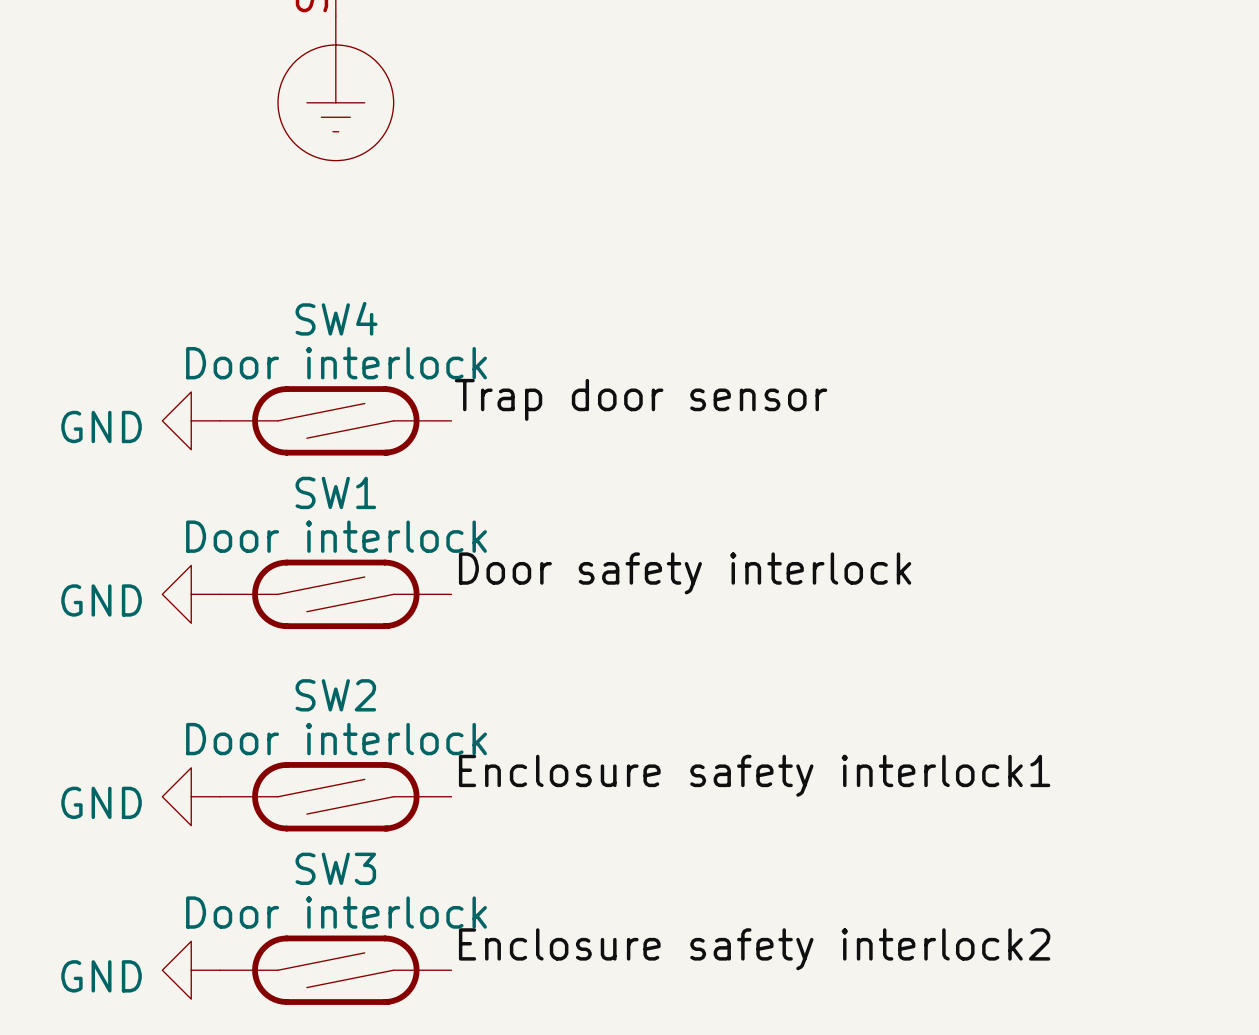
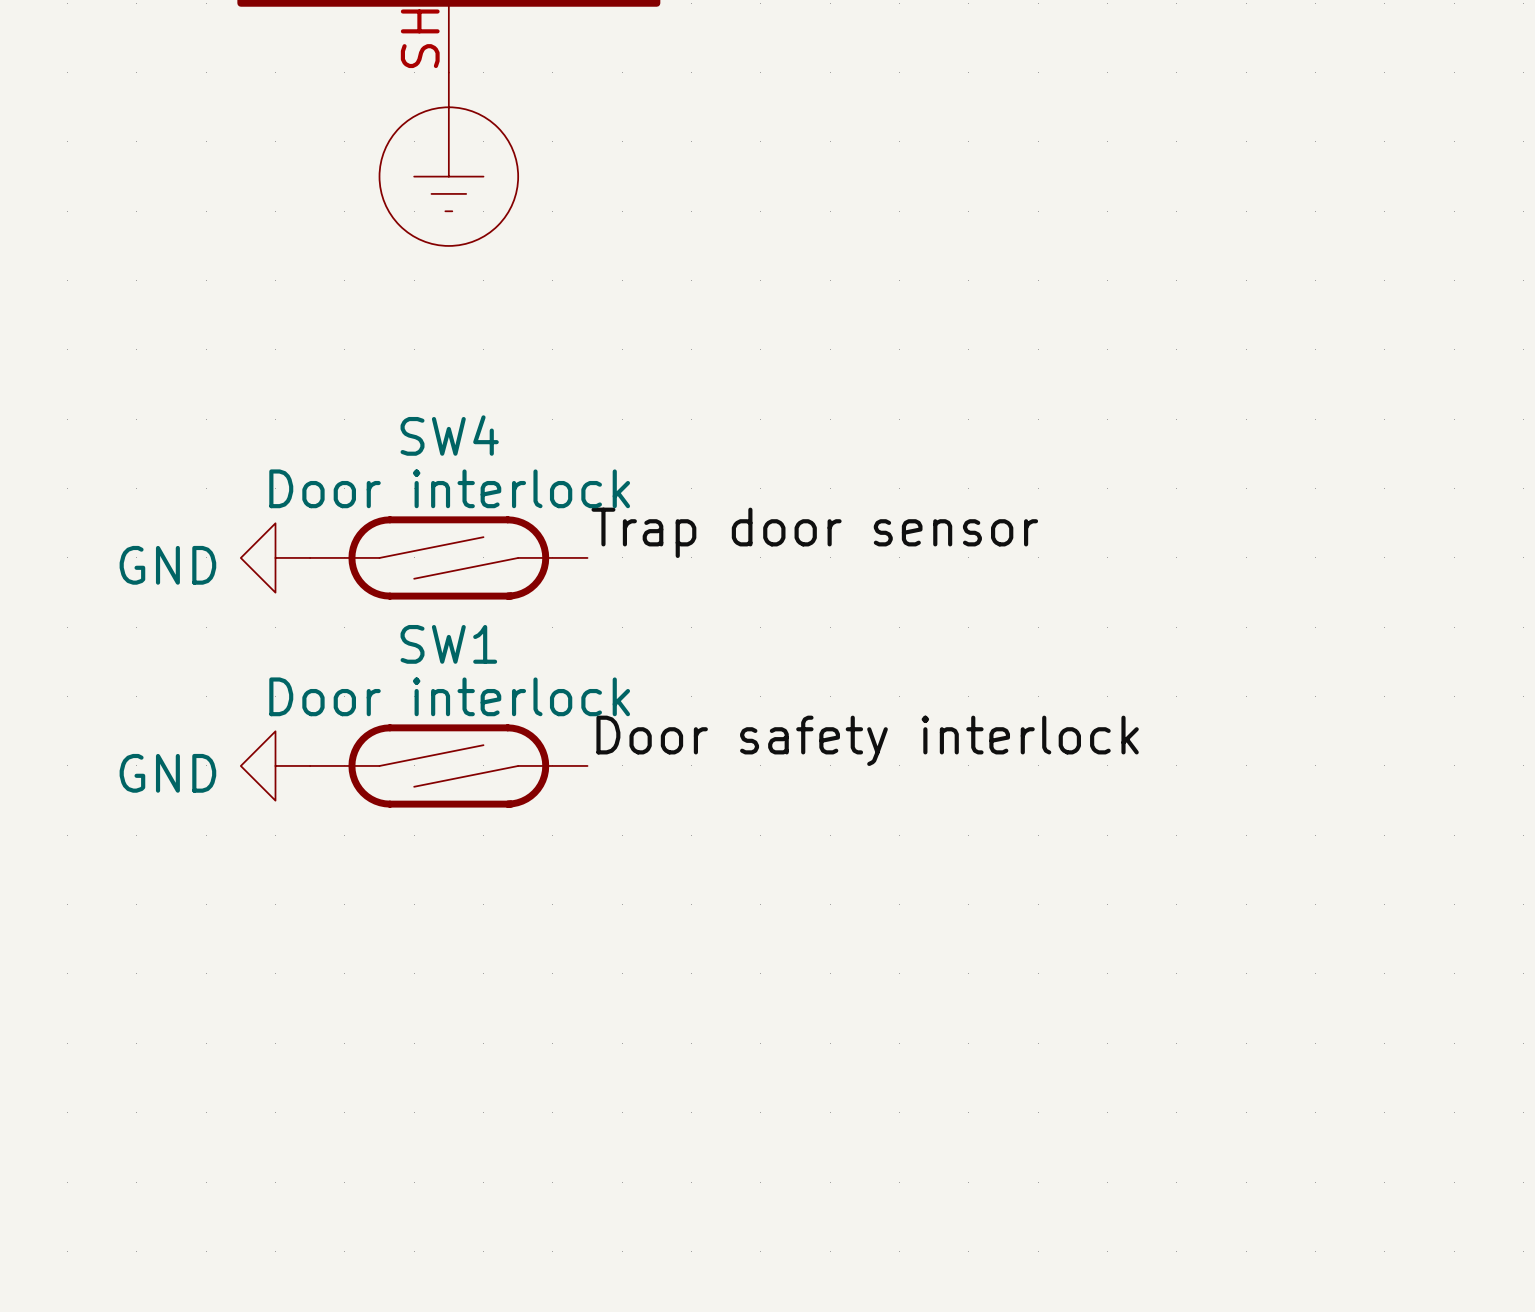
label: Enclosure safety interlock1 (754, 775) -> none
power symbol: GND (191, 796) -> none
SW2: Door interlock (335, 796) -> none
label: Enclosure safety interlock2 (754, 949) -> none
power symbol: GND (191, 970) -> none
SW3: Door interlock (335, 970) -> none

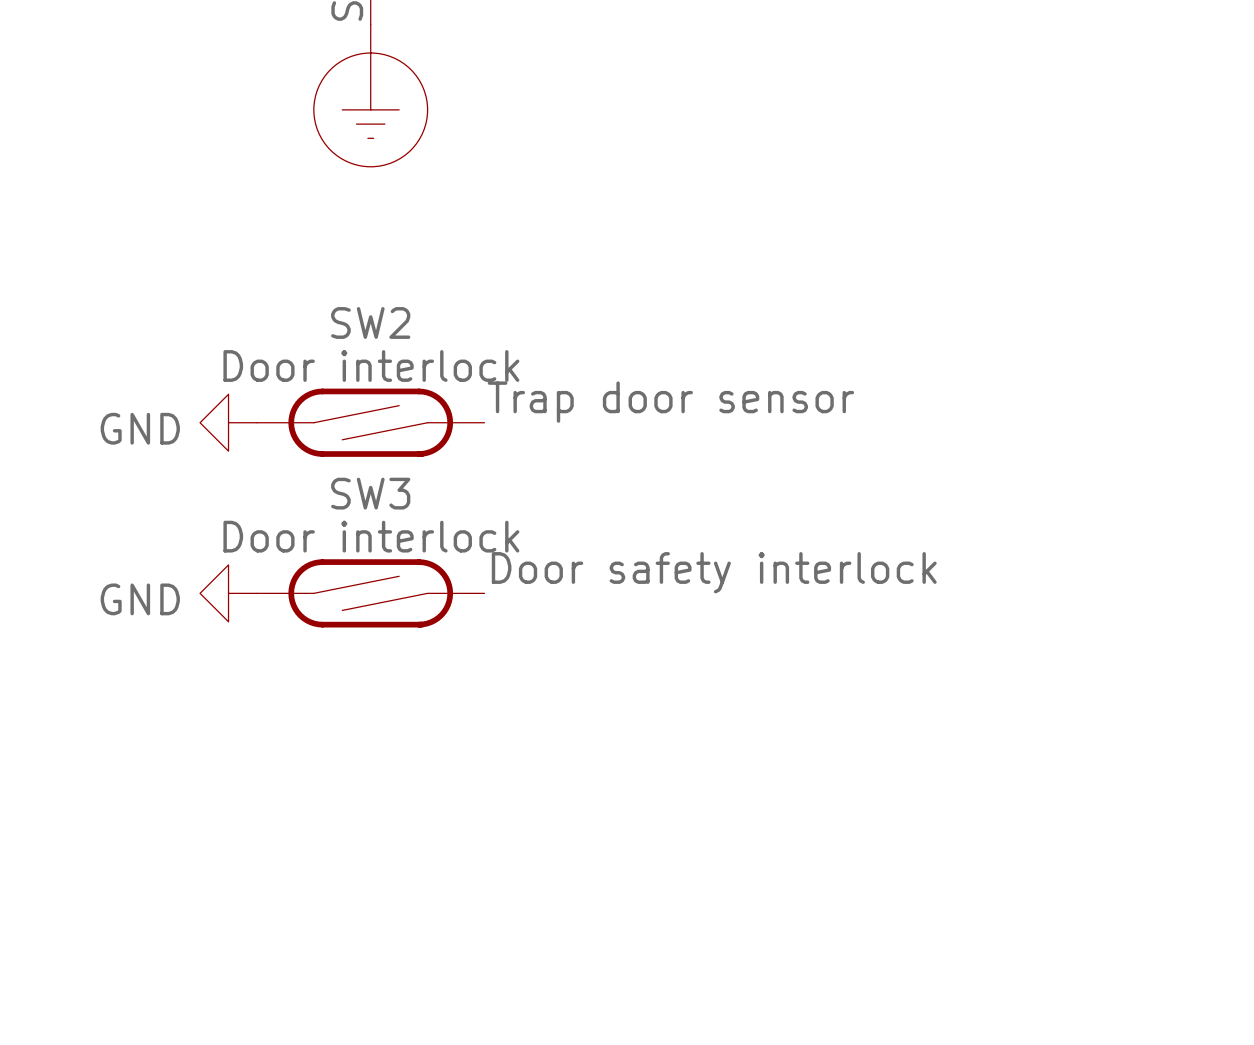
SW4 name: SW4 (449, 435) -> SW2 (370, 322)
SW1 name: SW1 (448, 644) -> SW3 (370, 493)

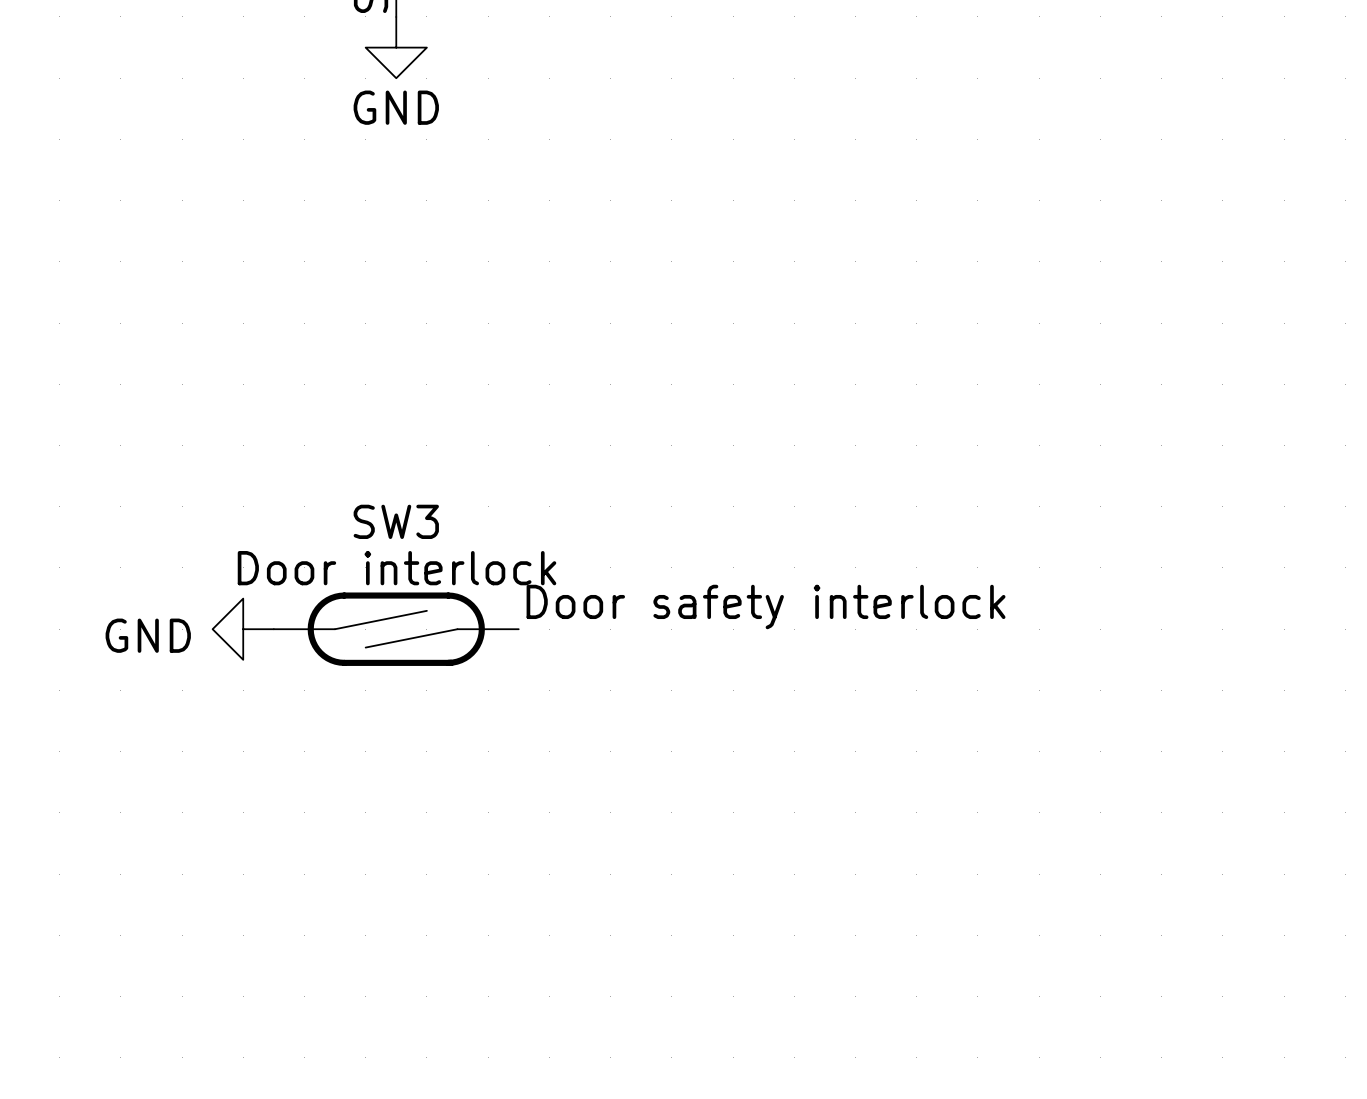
power symbol: (370, 95) -> none
label: Trap door sensor (670, 402) -> none
power symbol rotation: 0° (228, 422) -> 90° counterclockwise (396, 47)
power symbol position: GND (228, 422) -> GND (396, 47)
SW2: Door interlock (370, 422) -> none

